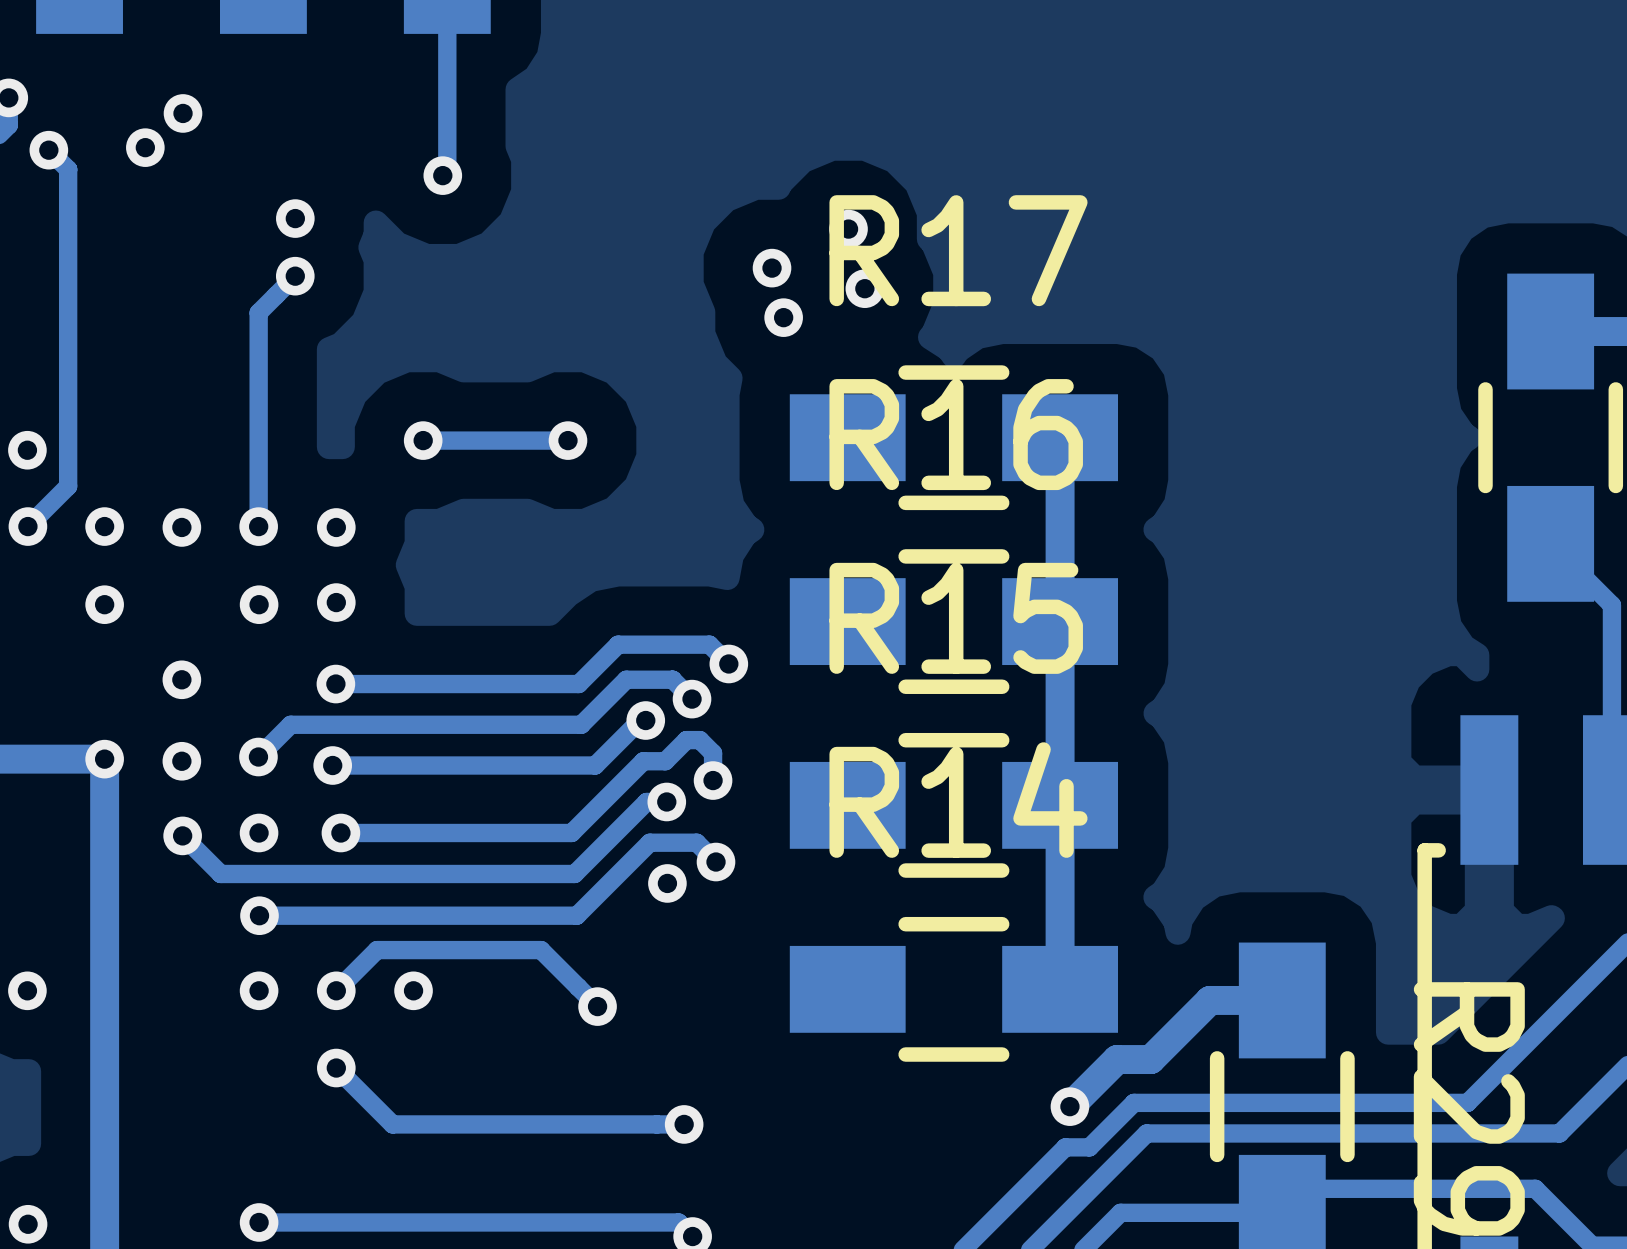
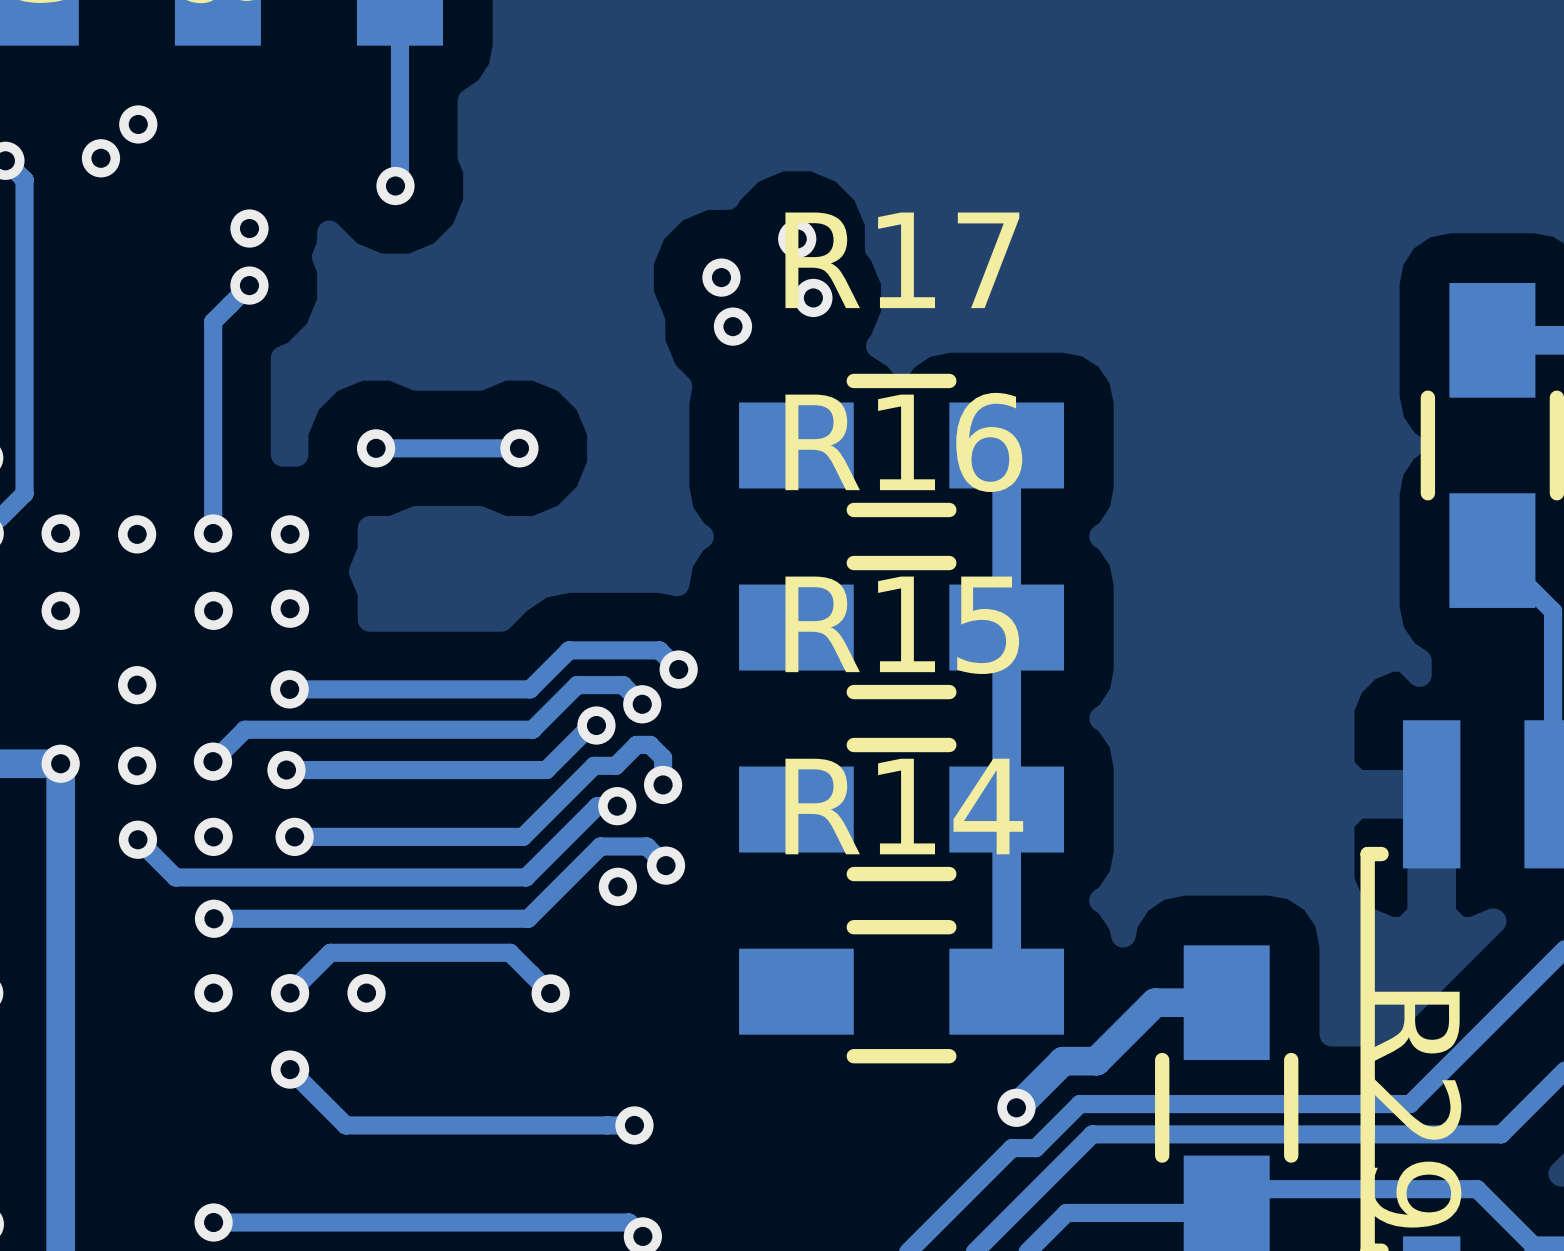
track: (541, 950) (597, 1006) -> (492, 952) (509, 952) (550, 993)
via position: (597, 1006) -> (550, 993)

